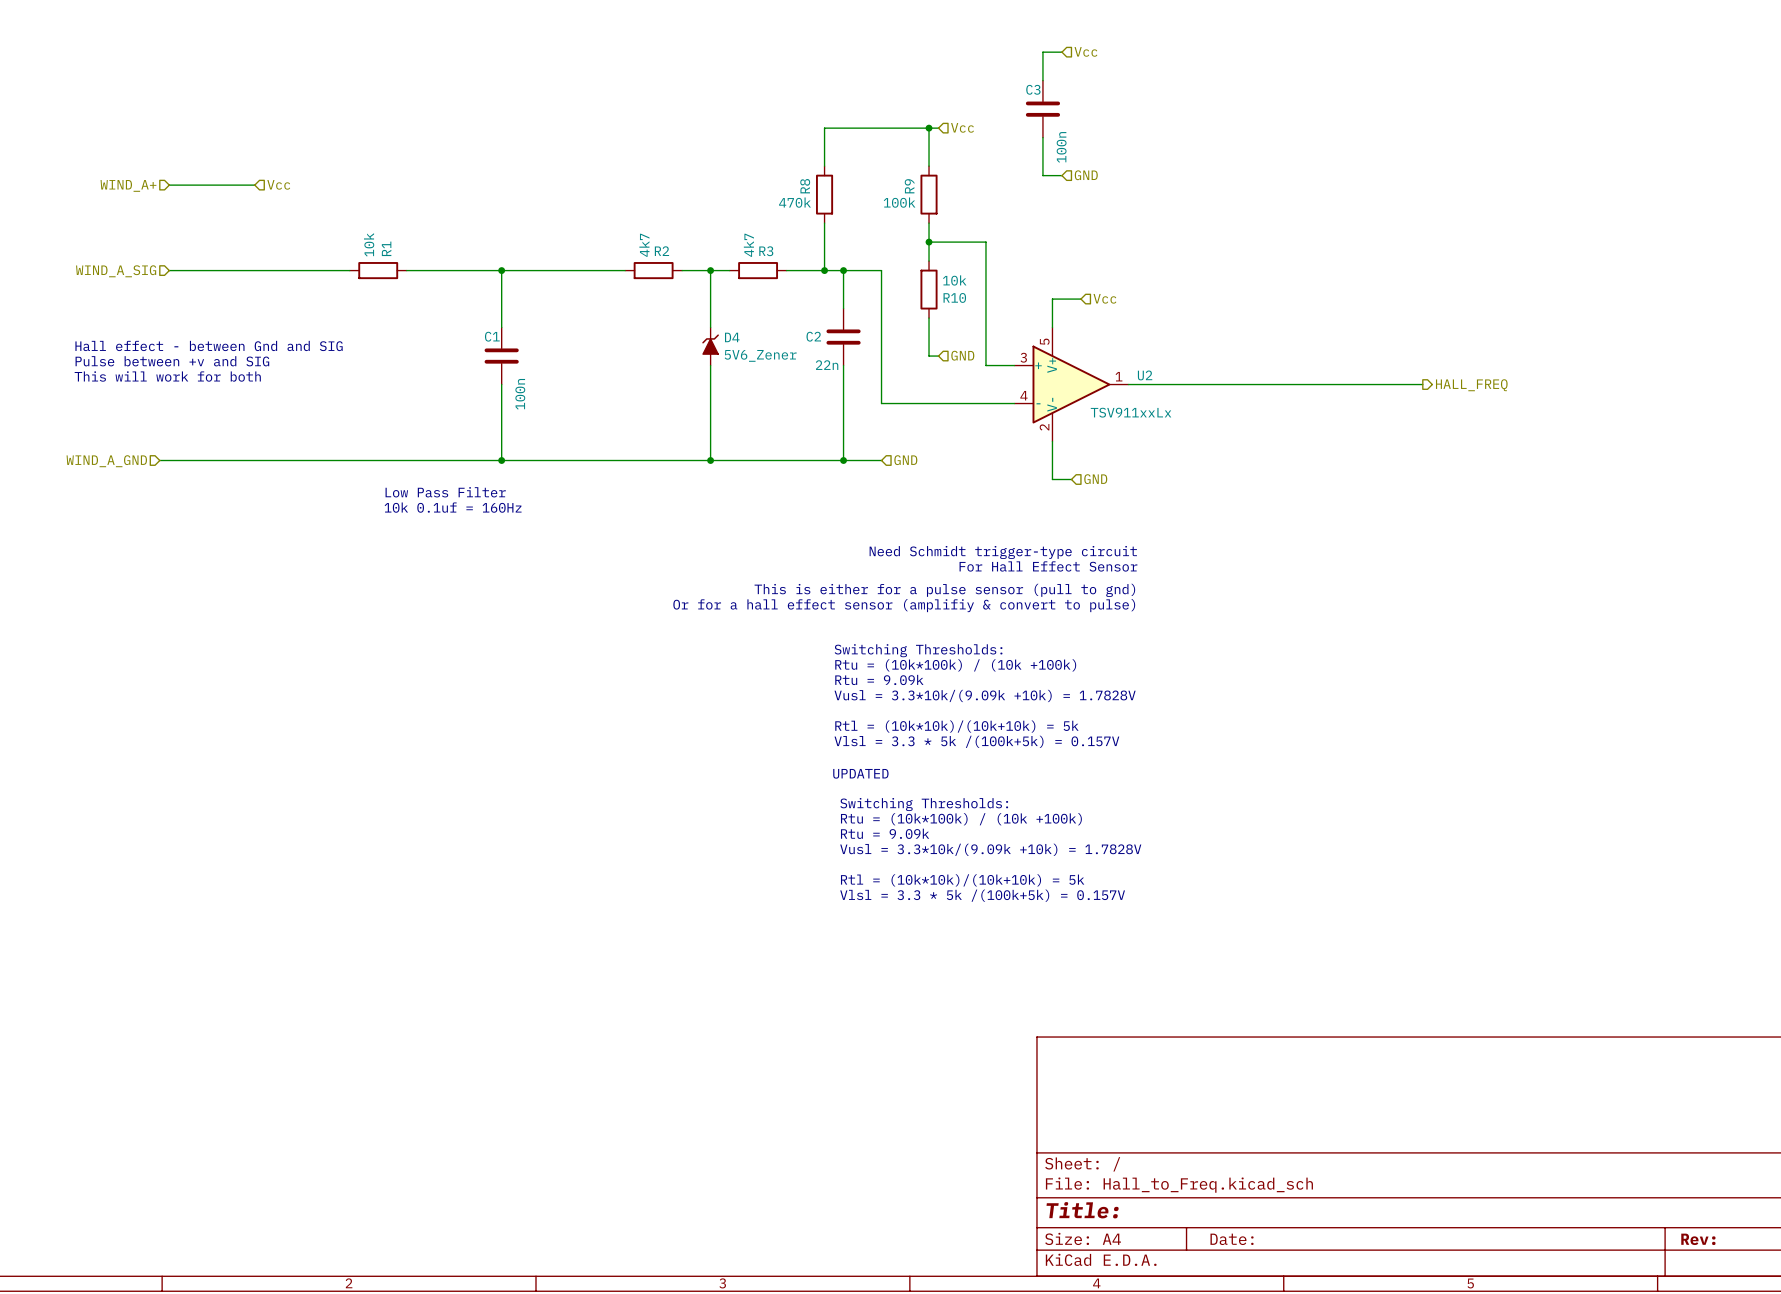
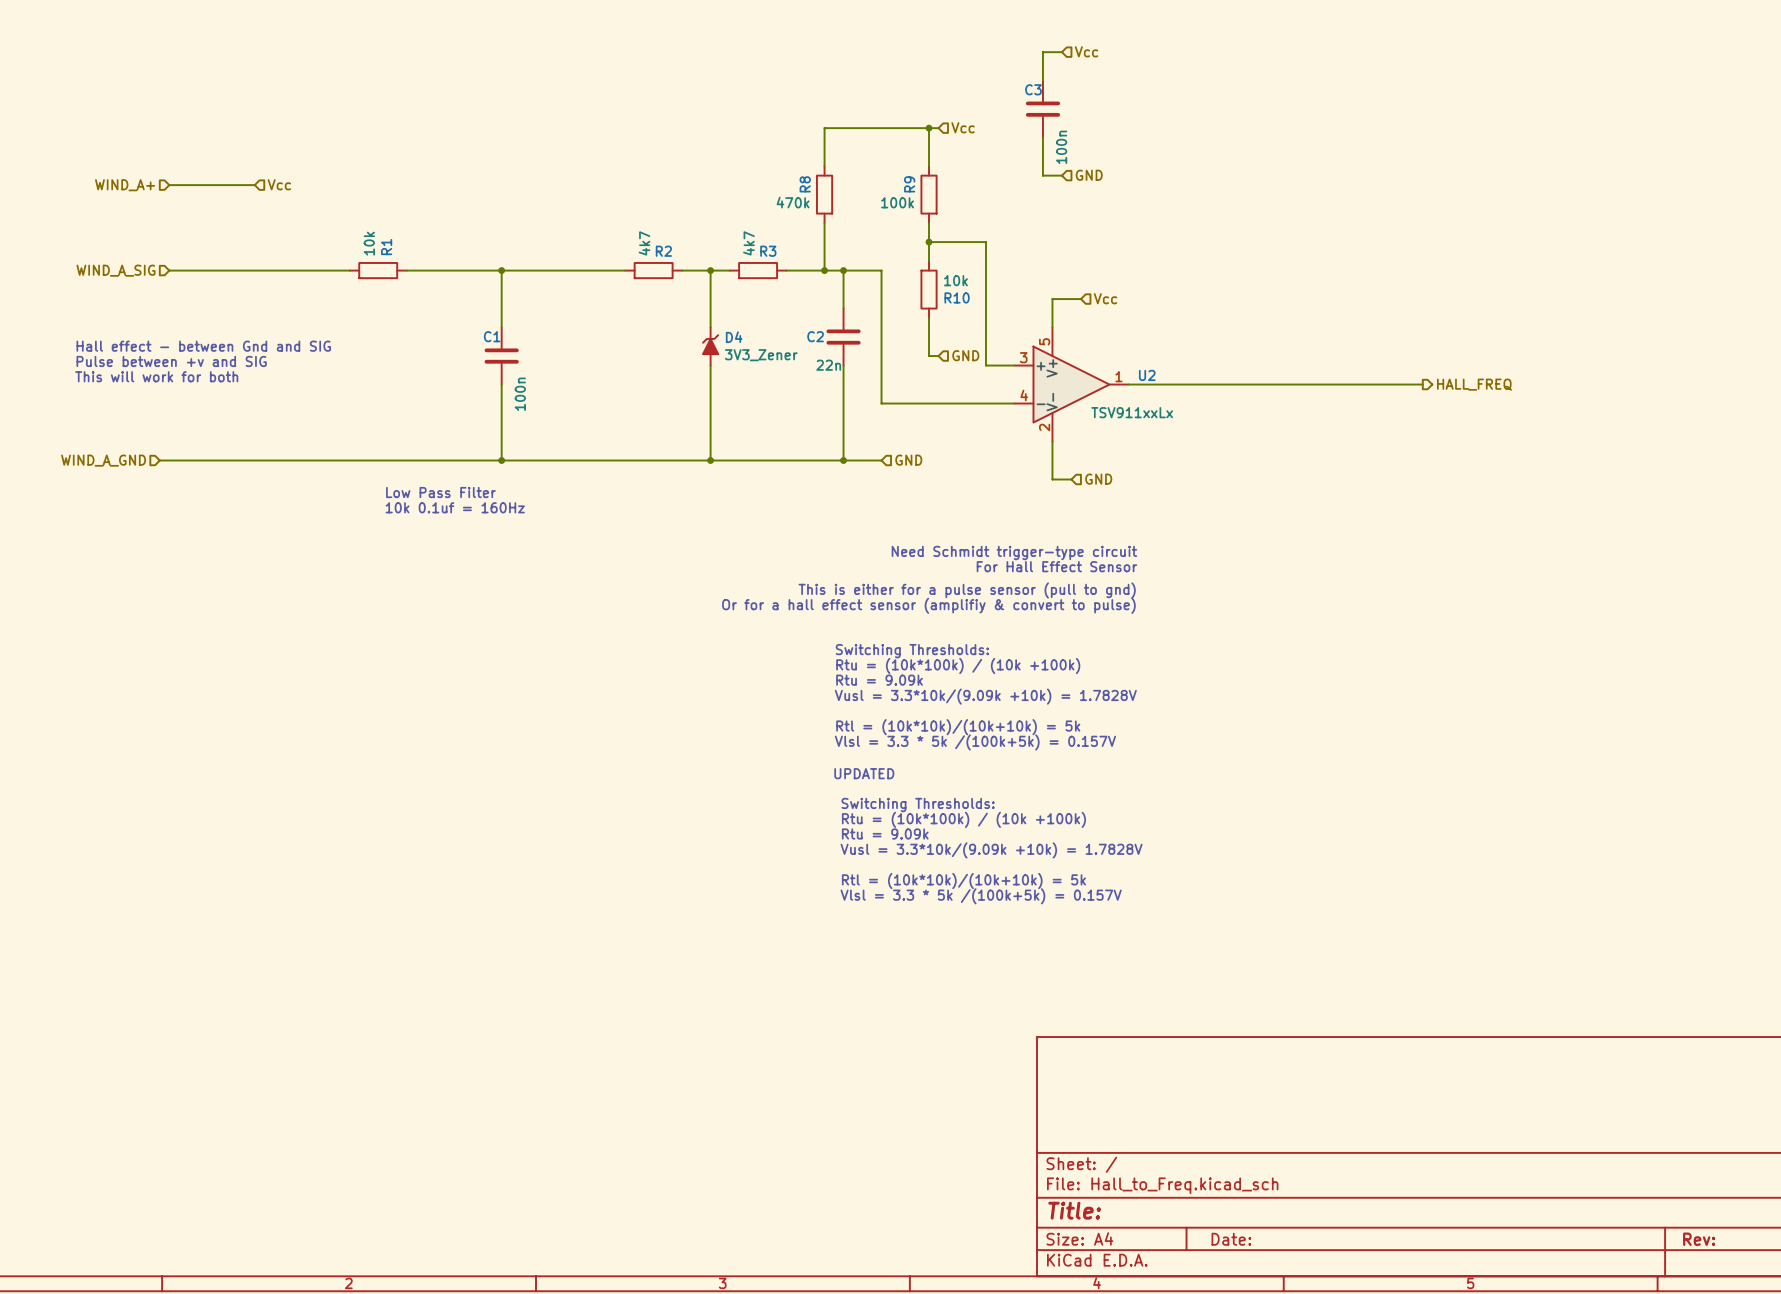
D4 value: 5V6_Zener (760, 355) -> 3V3_Zener (761, 355)

